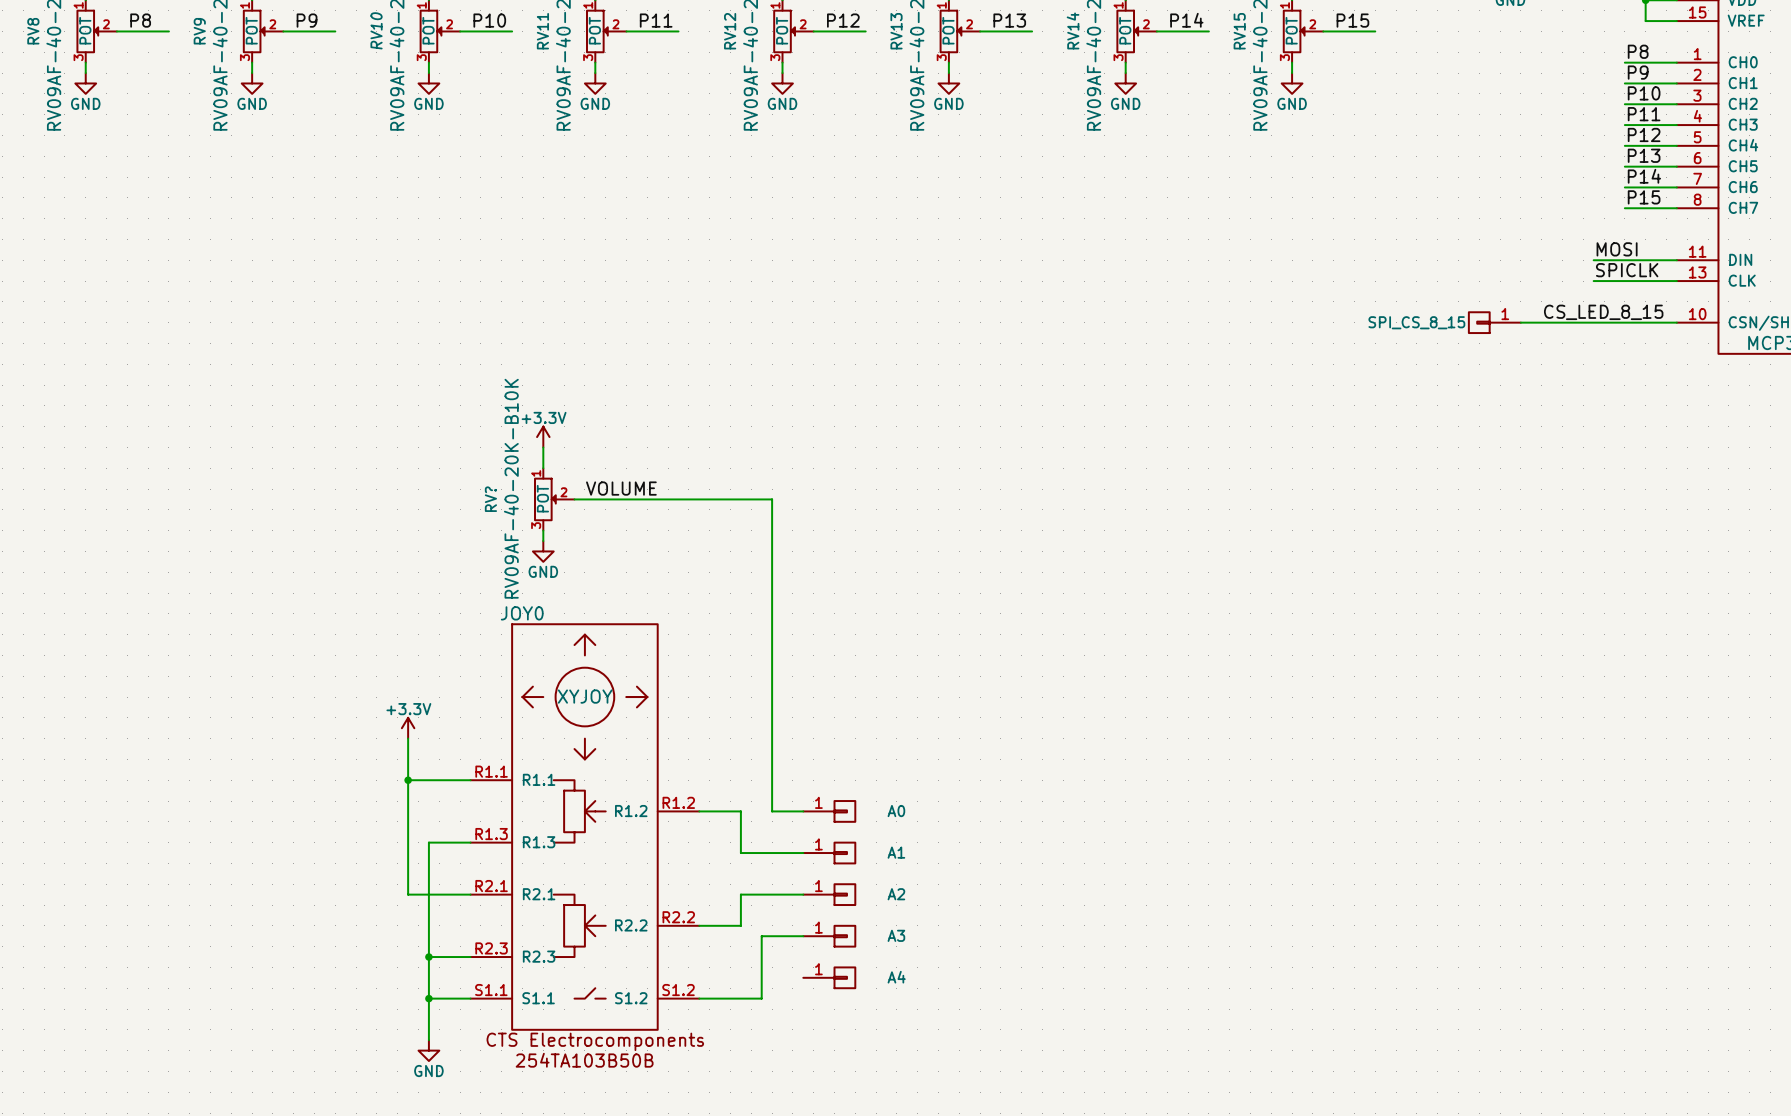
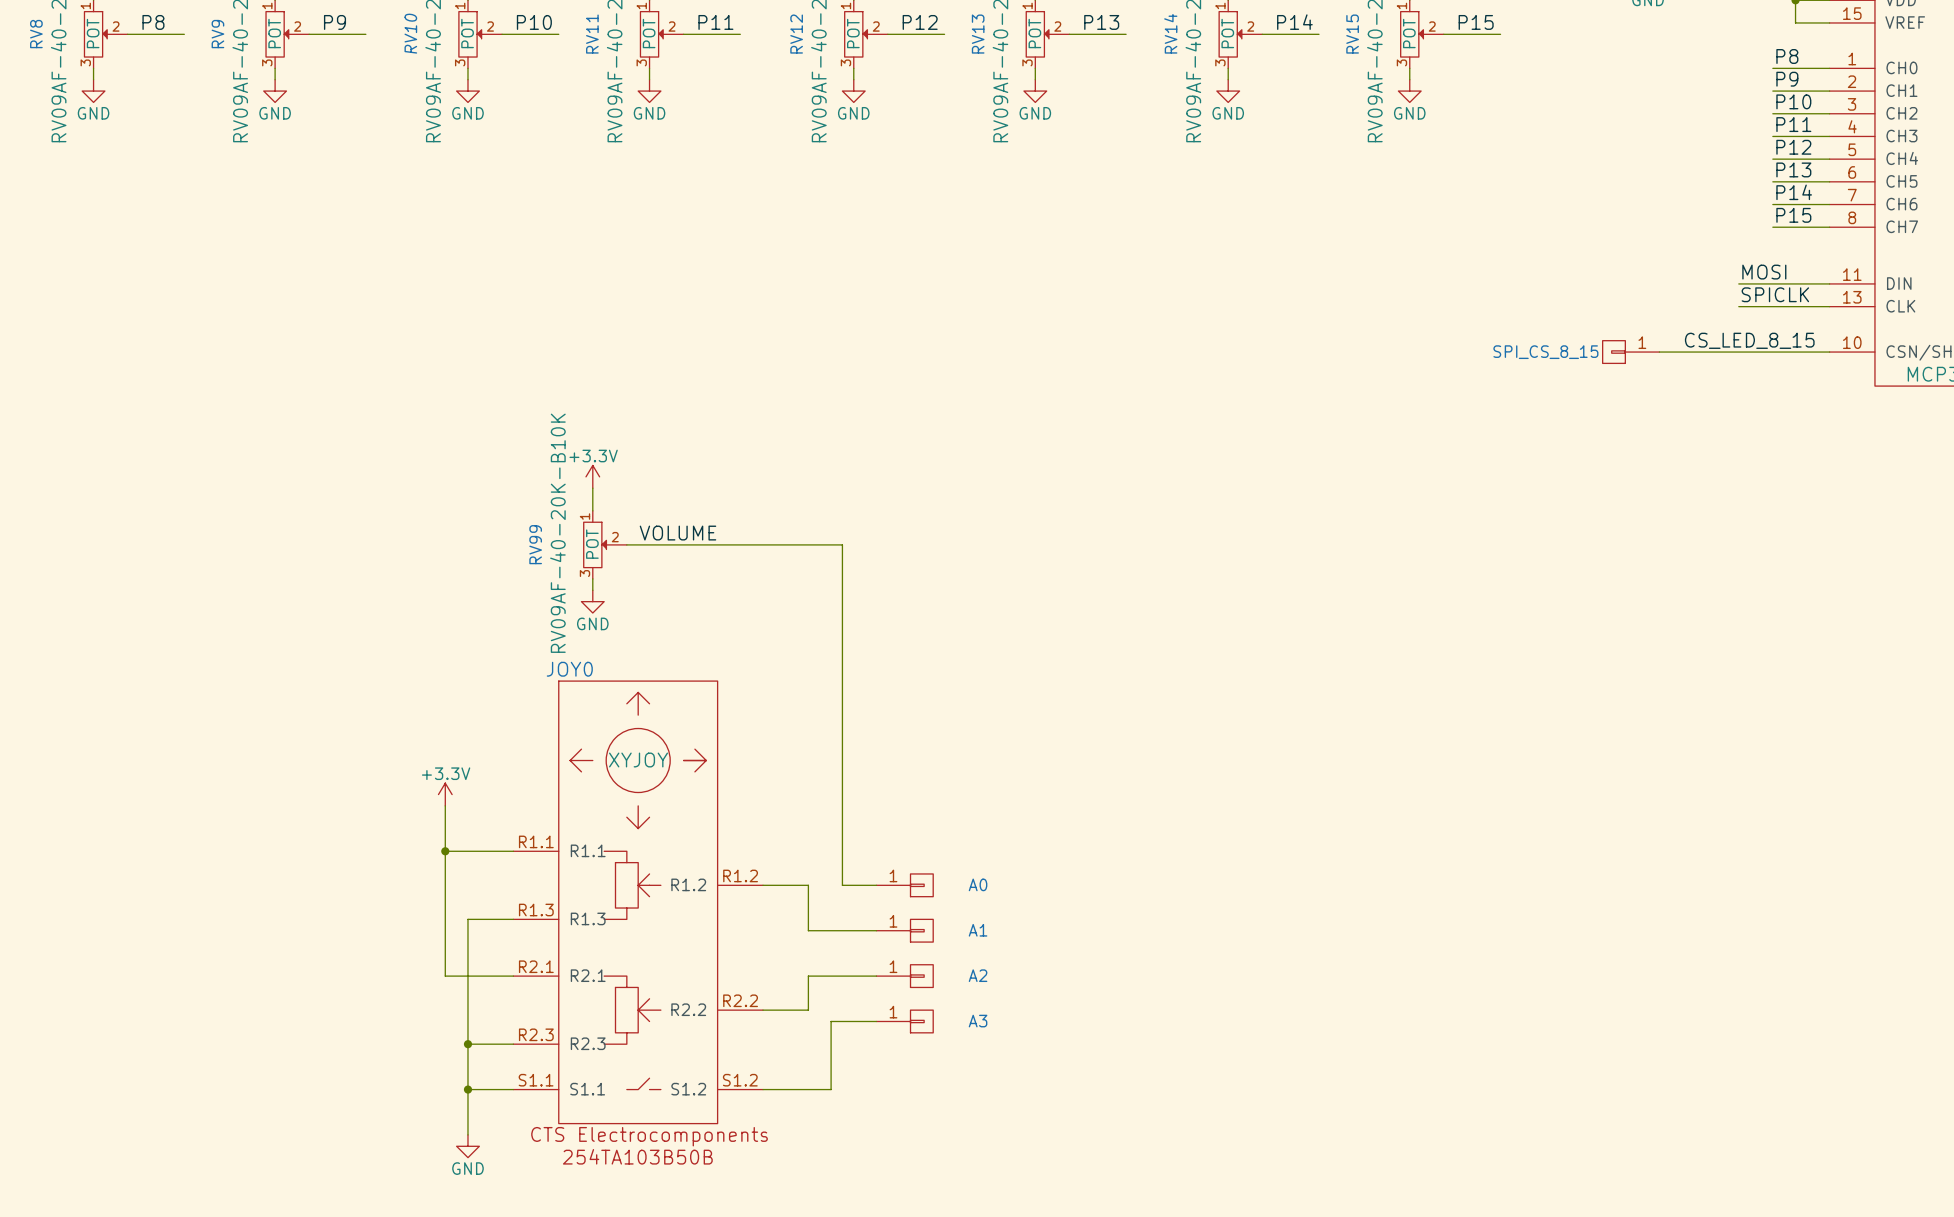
RV? name: RV? (490, 499) -> RV99 (535, 544)
A4: (829, 977) -> none

